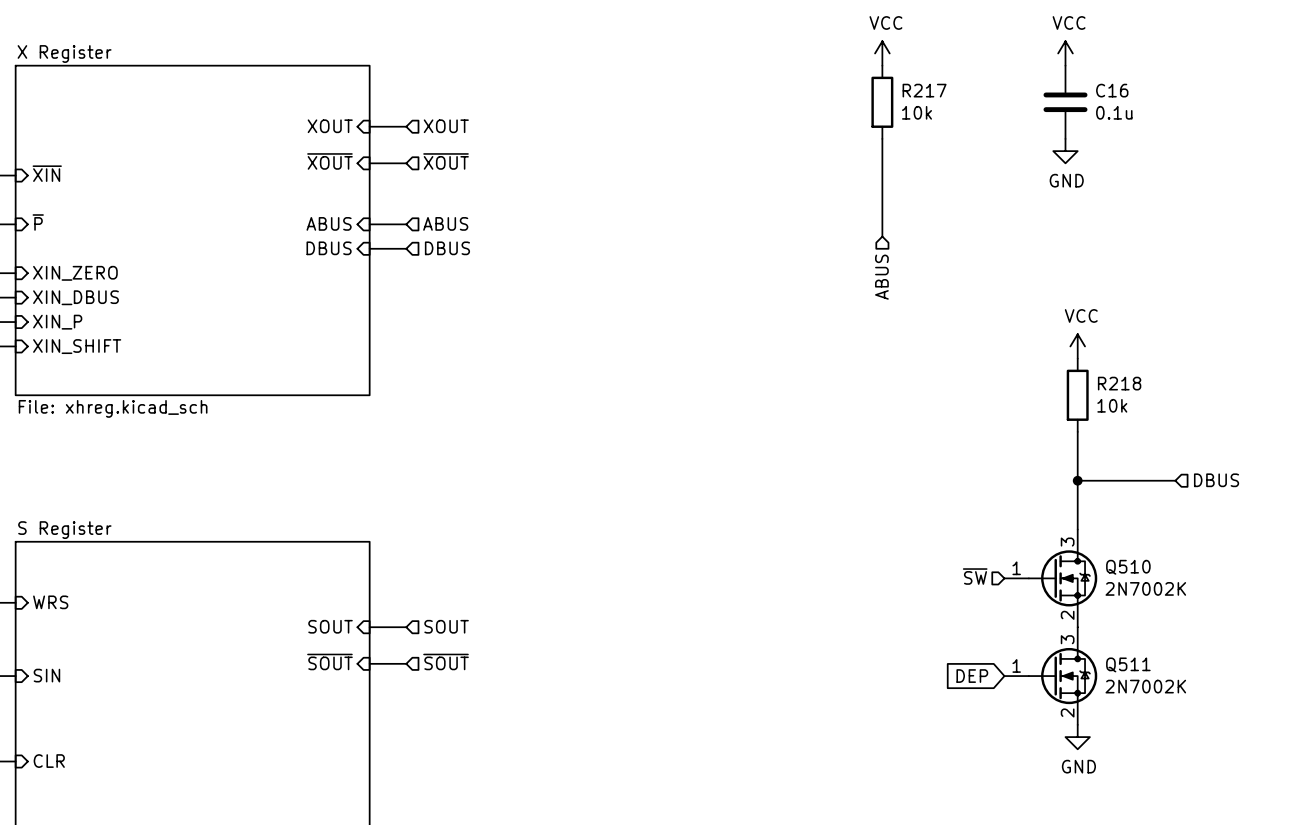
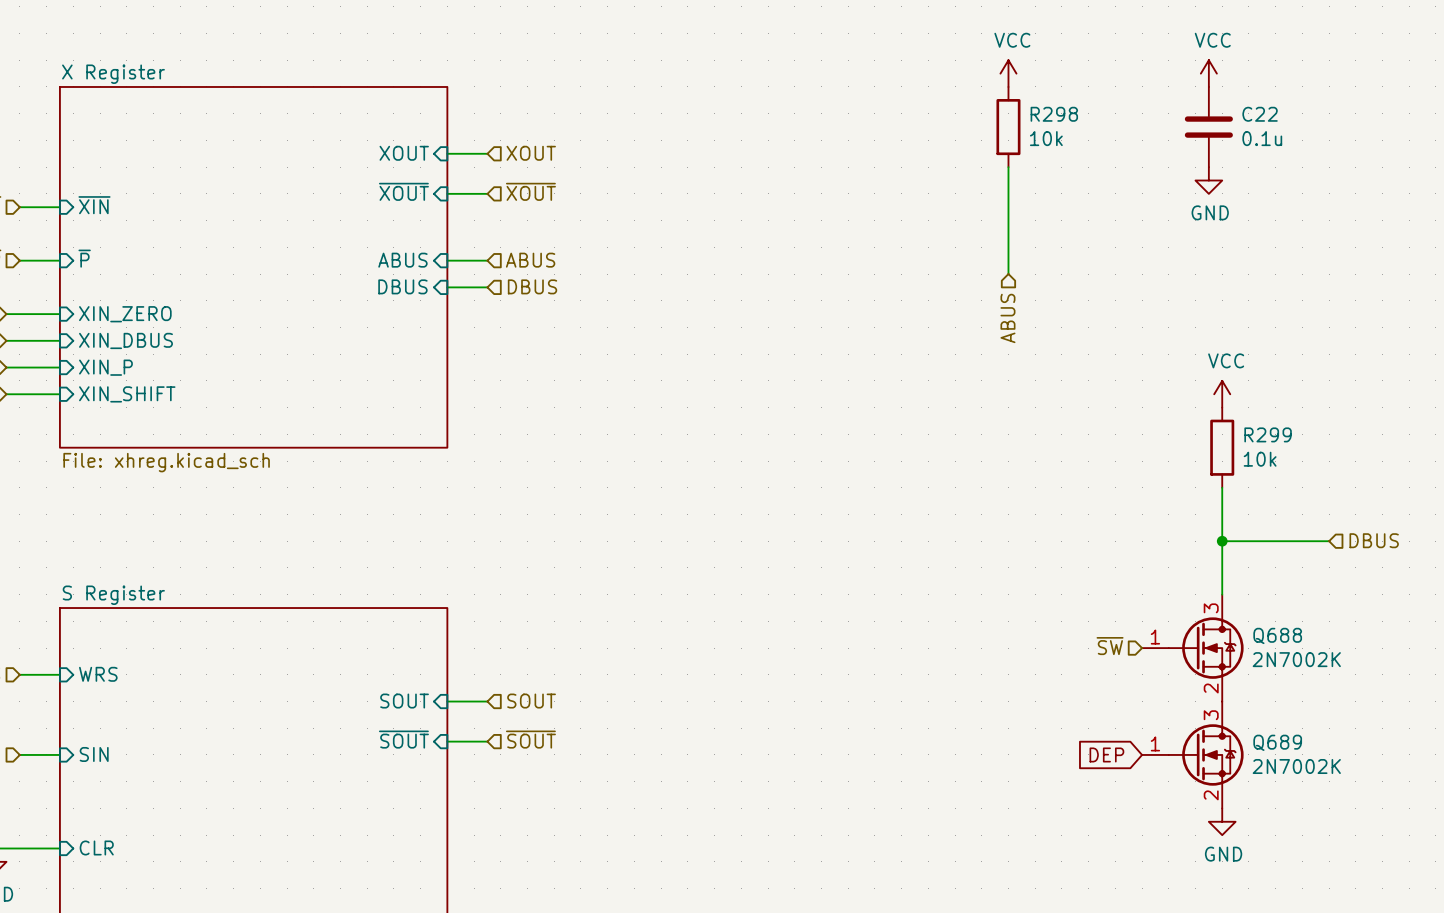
R217 name: R217 (924, 90) -> R298 (1054, 114)
C16 name: C16 (1112, 90) -> C22 (1260, 114)
R218 name: R218 (1119, 383) -> R299 (1268, 434)
Q510 name: Q510 (1128, 567) -> Q688 (1277, 635)
Q511 name: Q511 (1128, 664) -> Q689 (1277, 742)

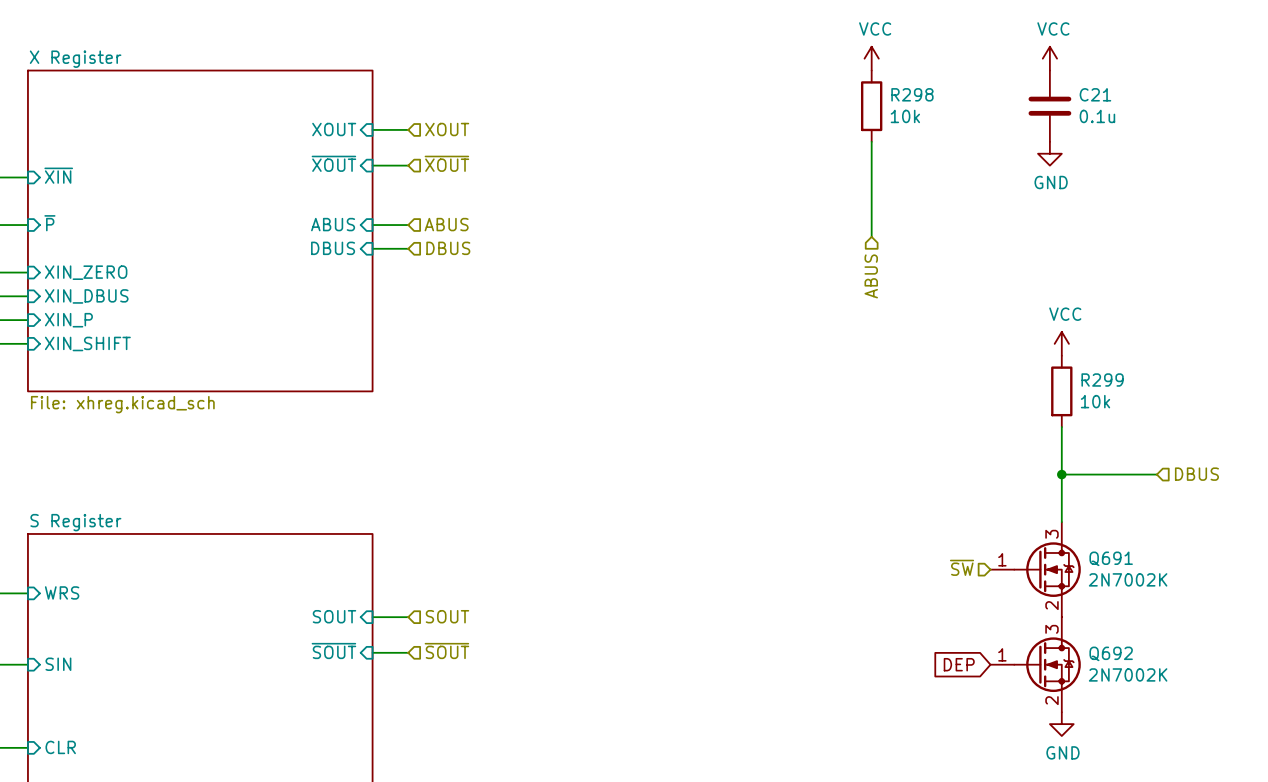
C22 name: C22 (1260, 114) -> C21 (1095, 94)
Q688 name: Q688 (1277, 635) -> Q691 (1111, 558)
Q689 name: Q689 (1277, 742) -> Q692 (1111, 653)

